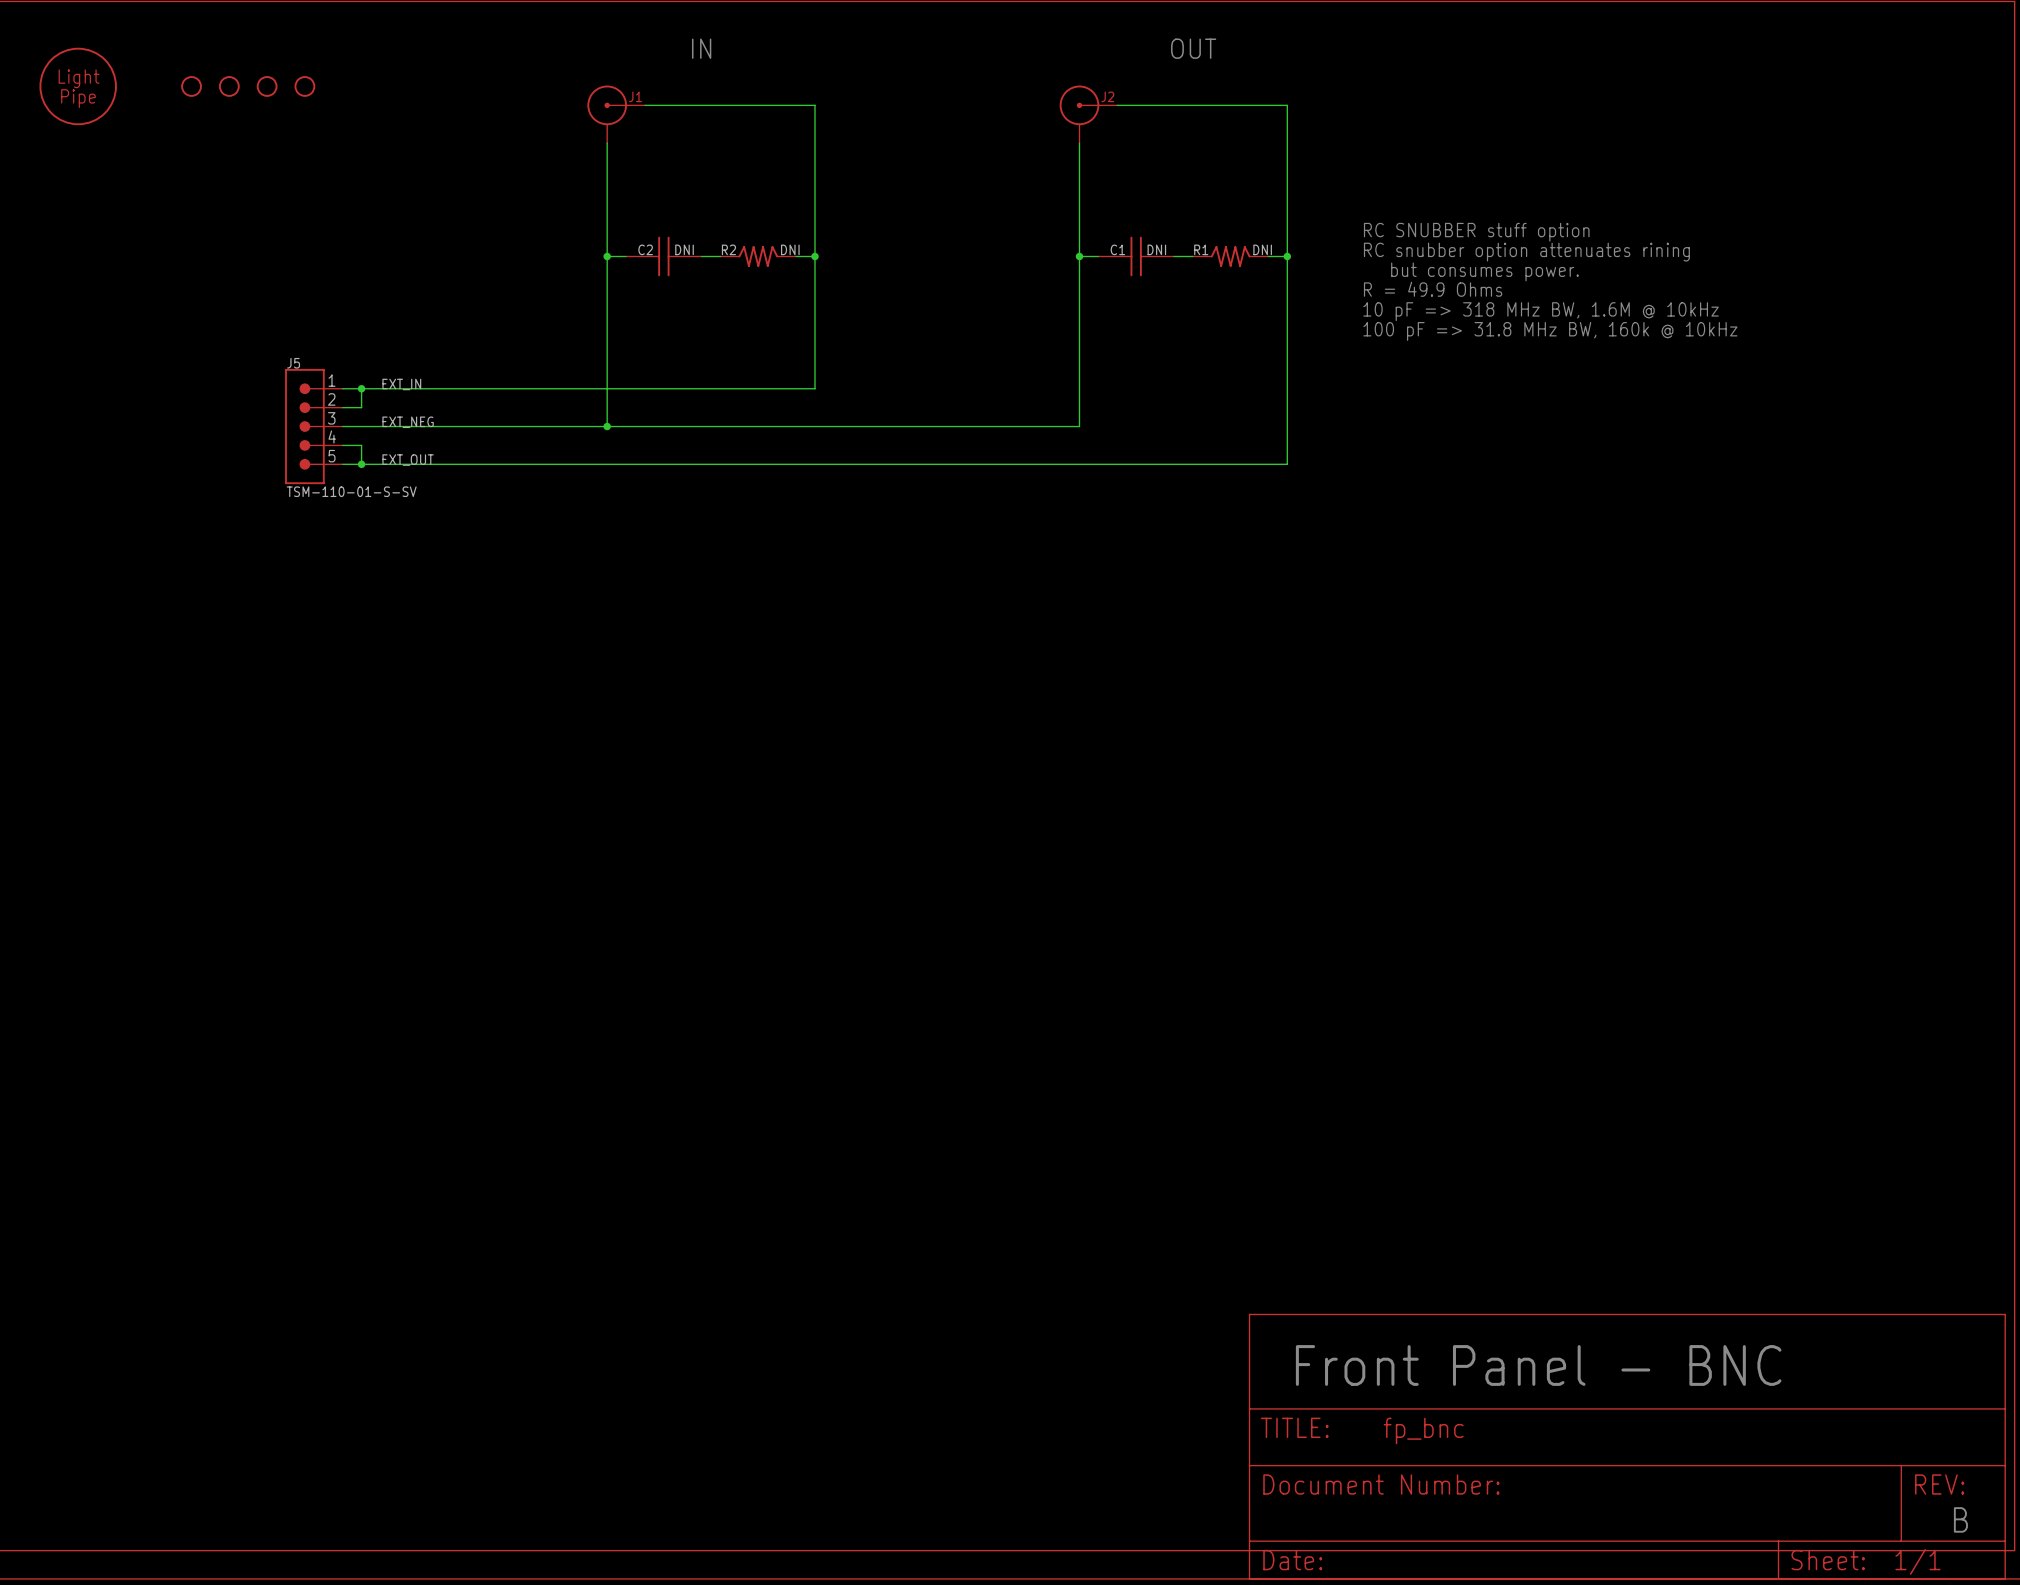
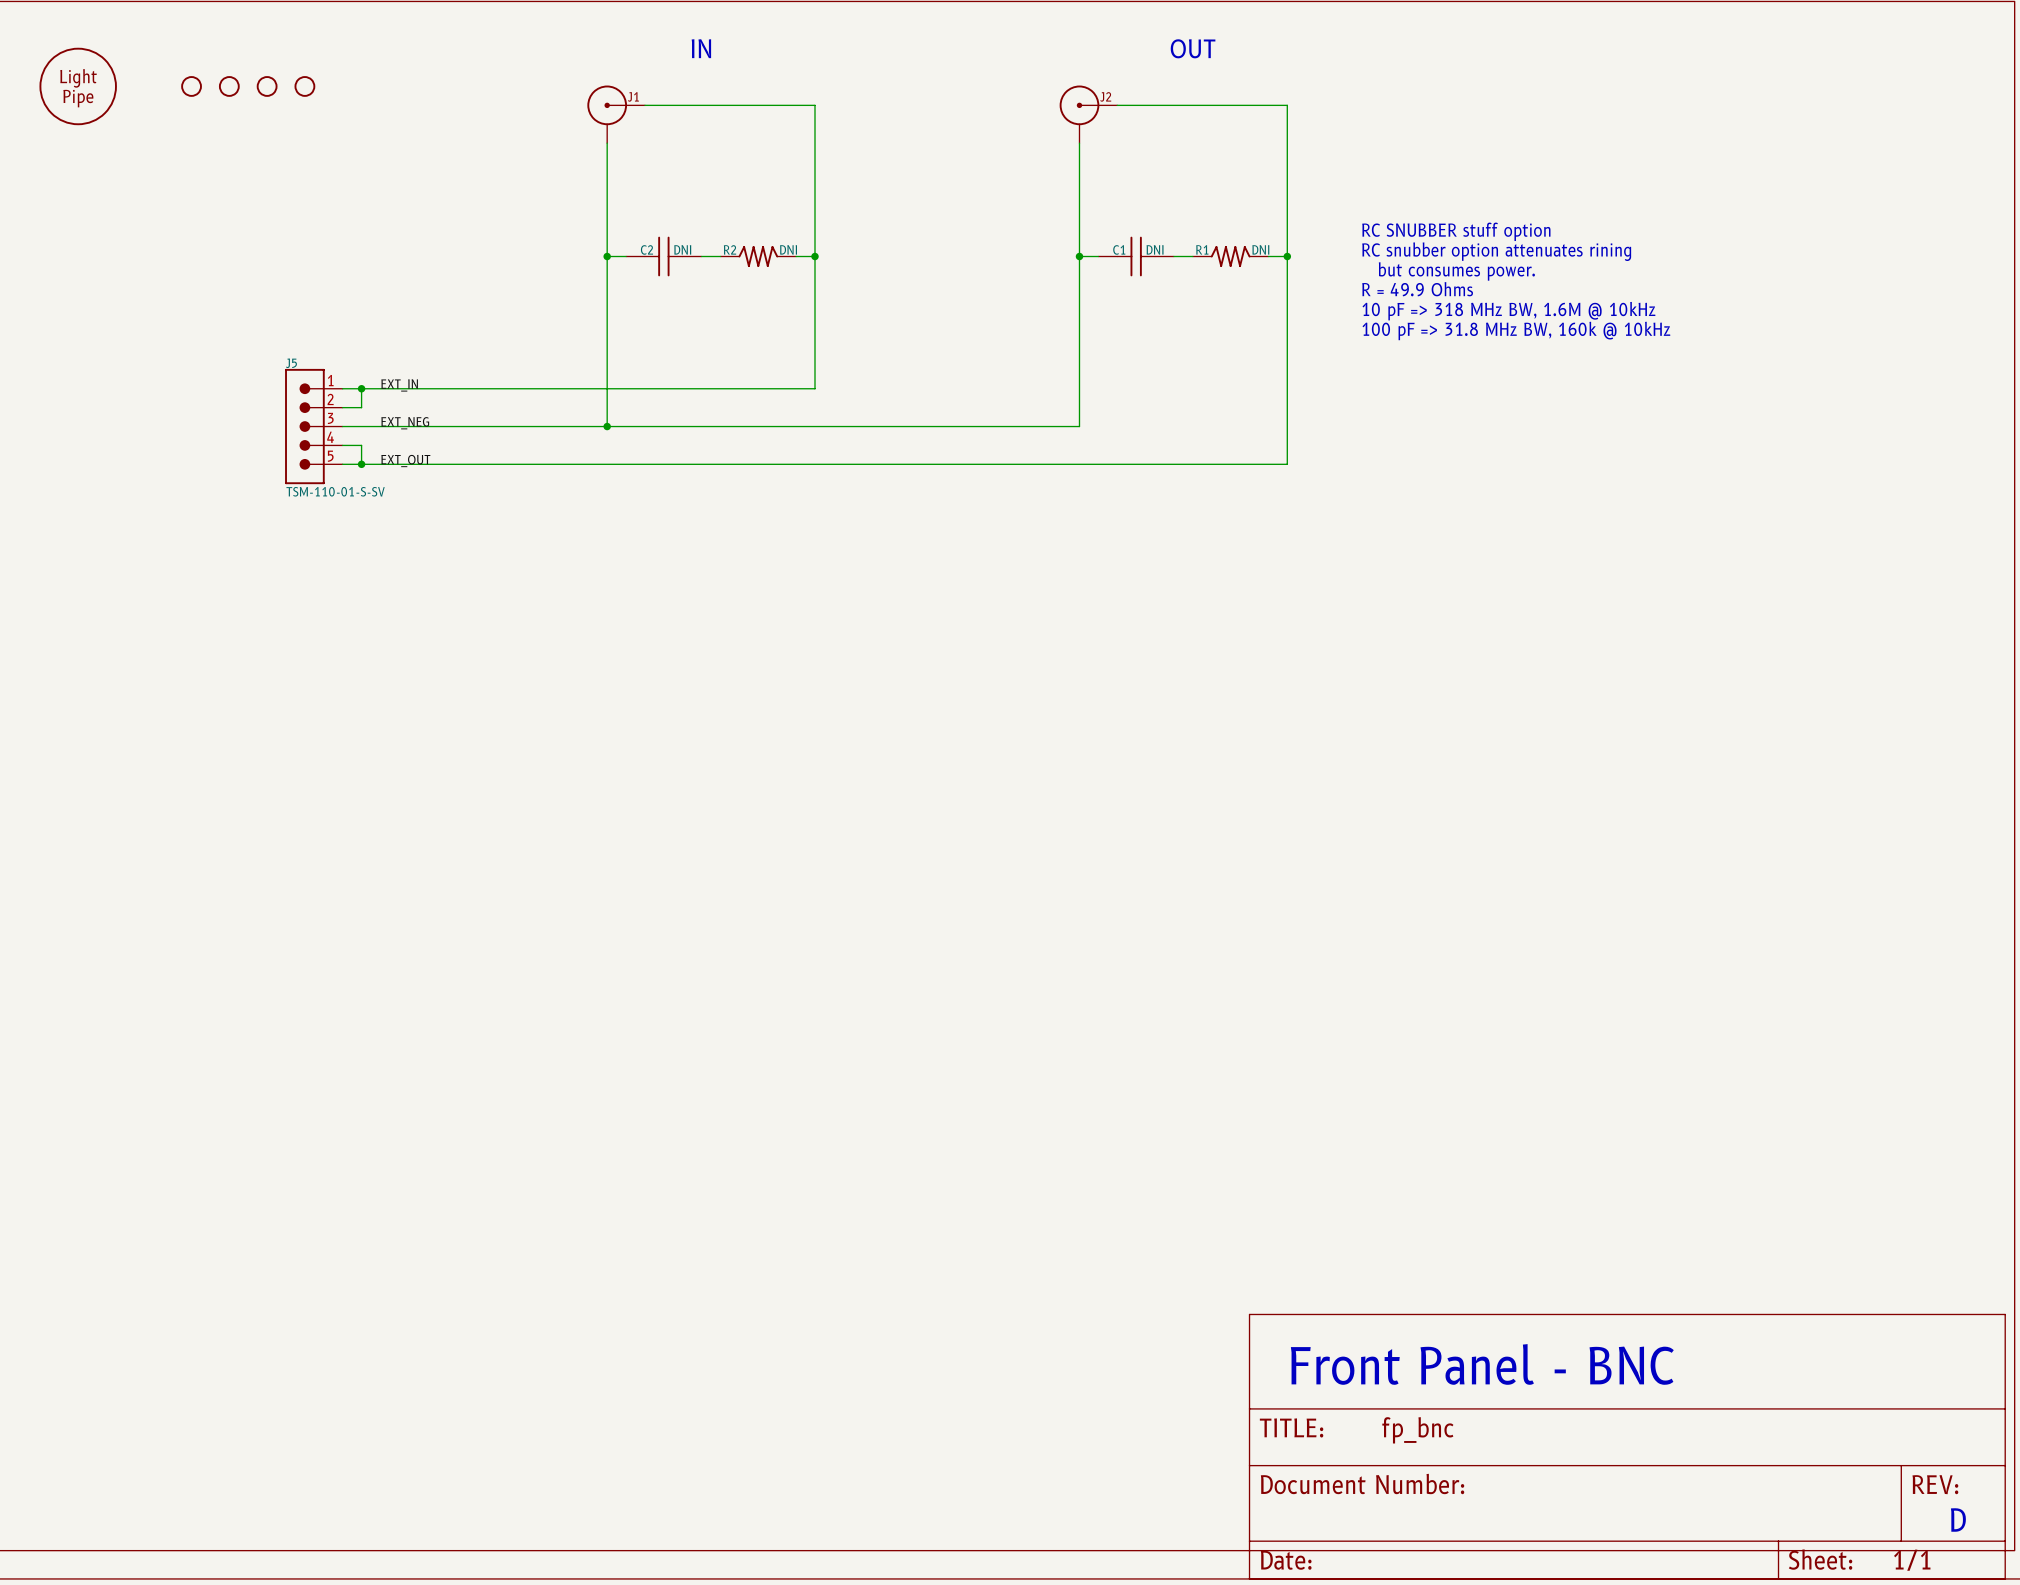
text: B (1960, 1519) -> D (1958, 1520)

